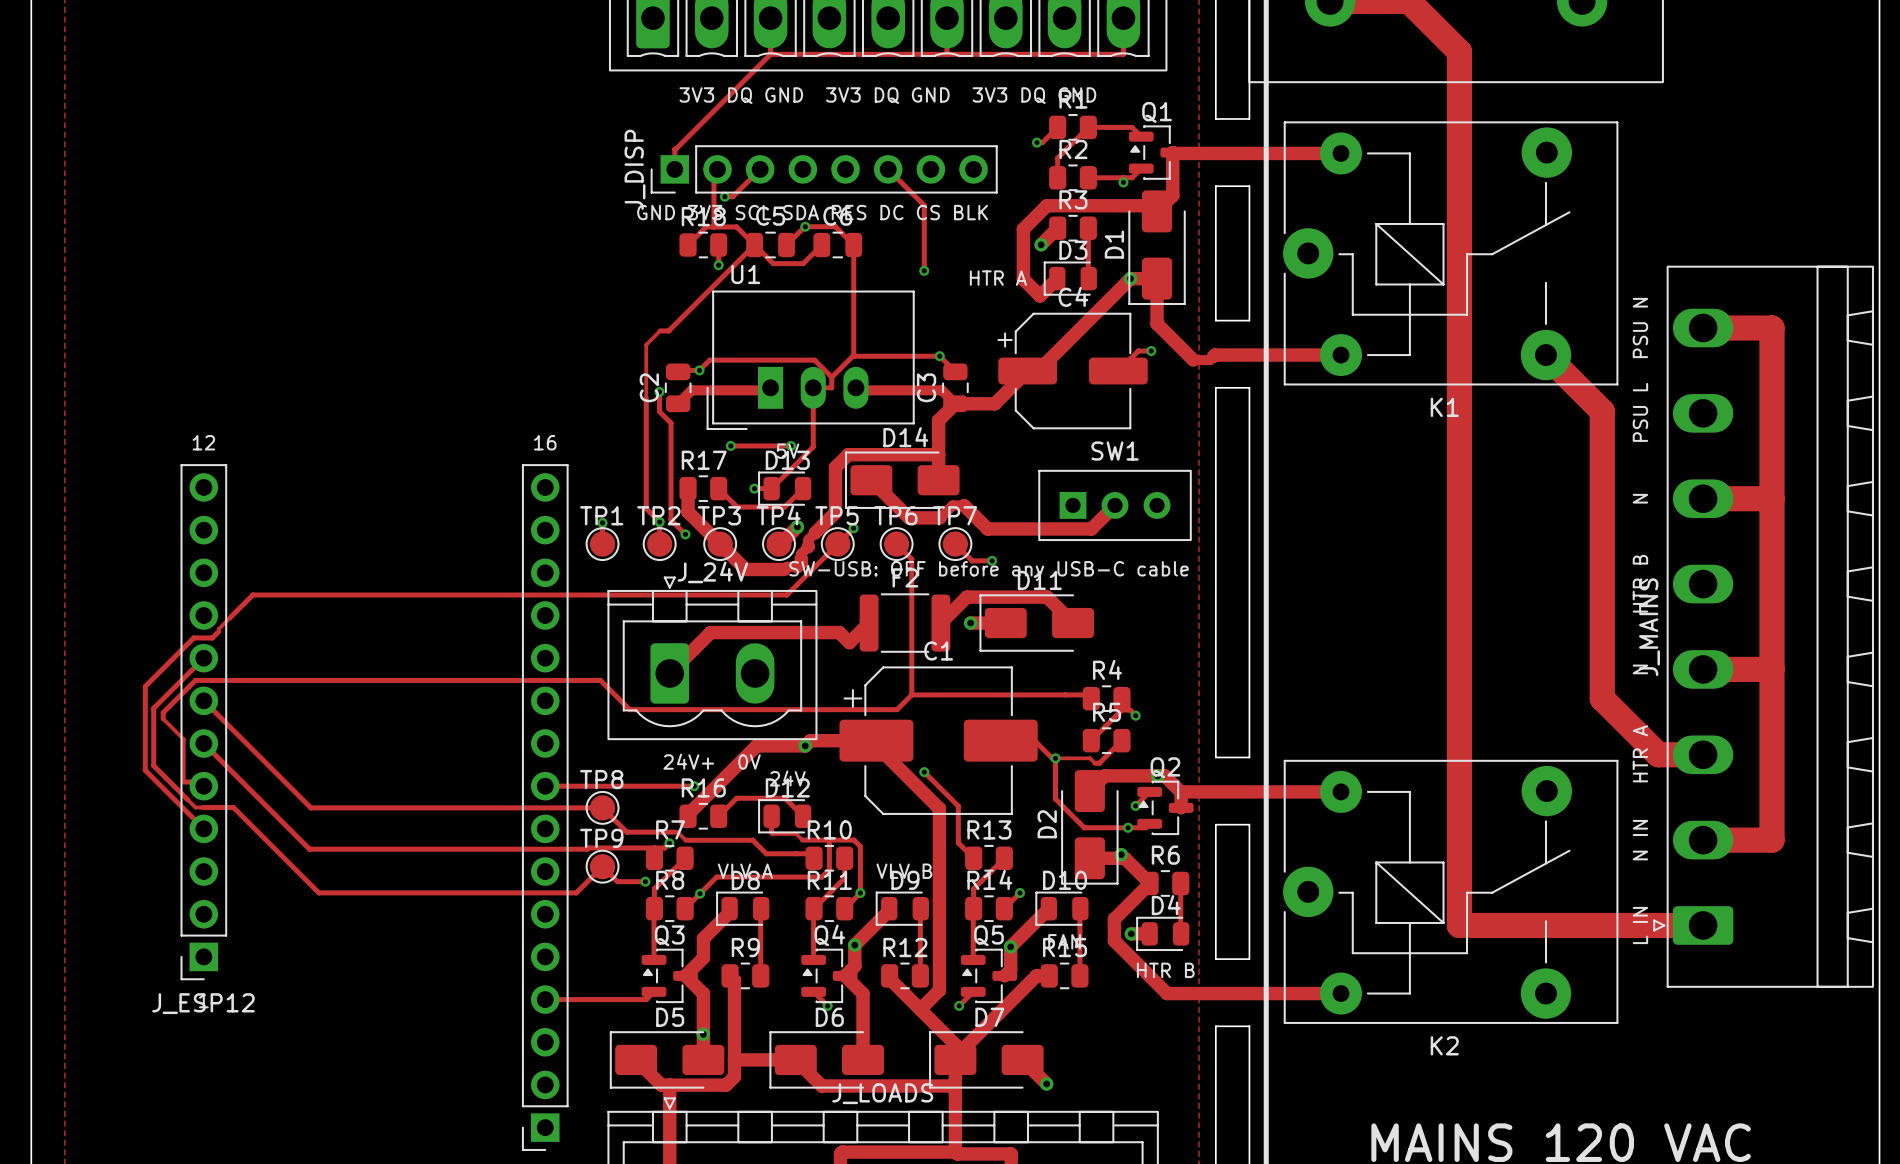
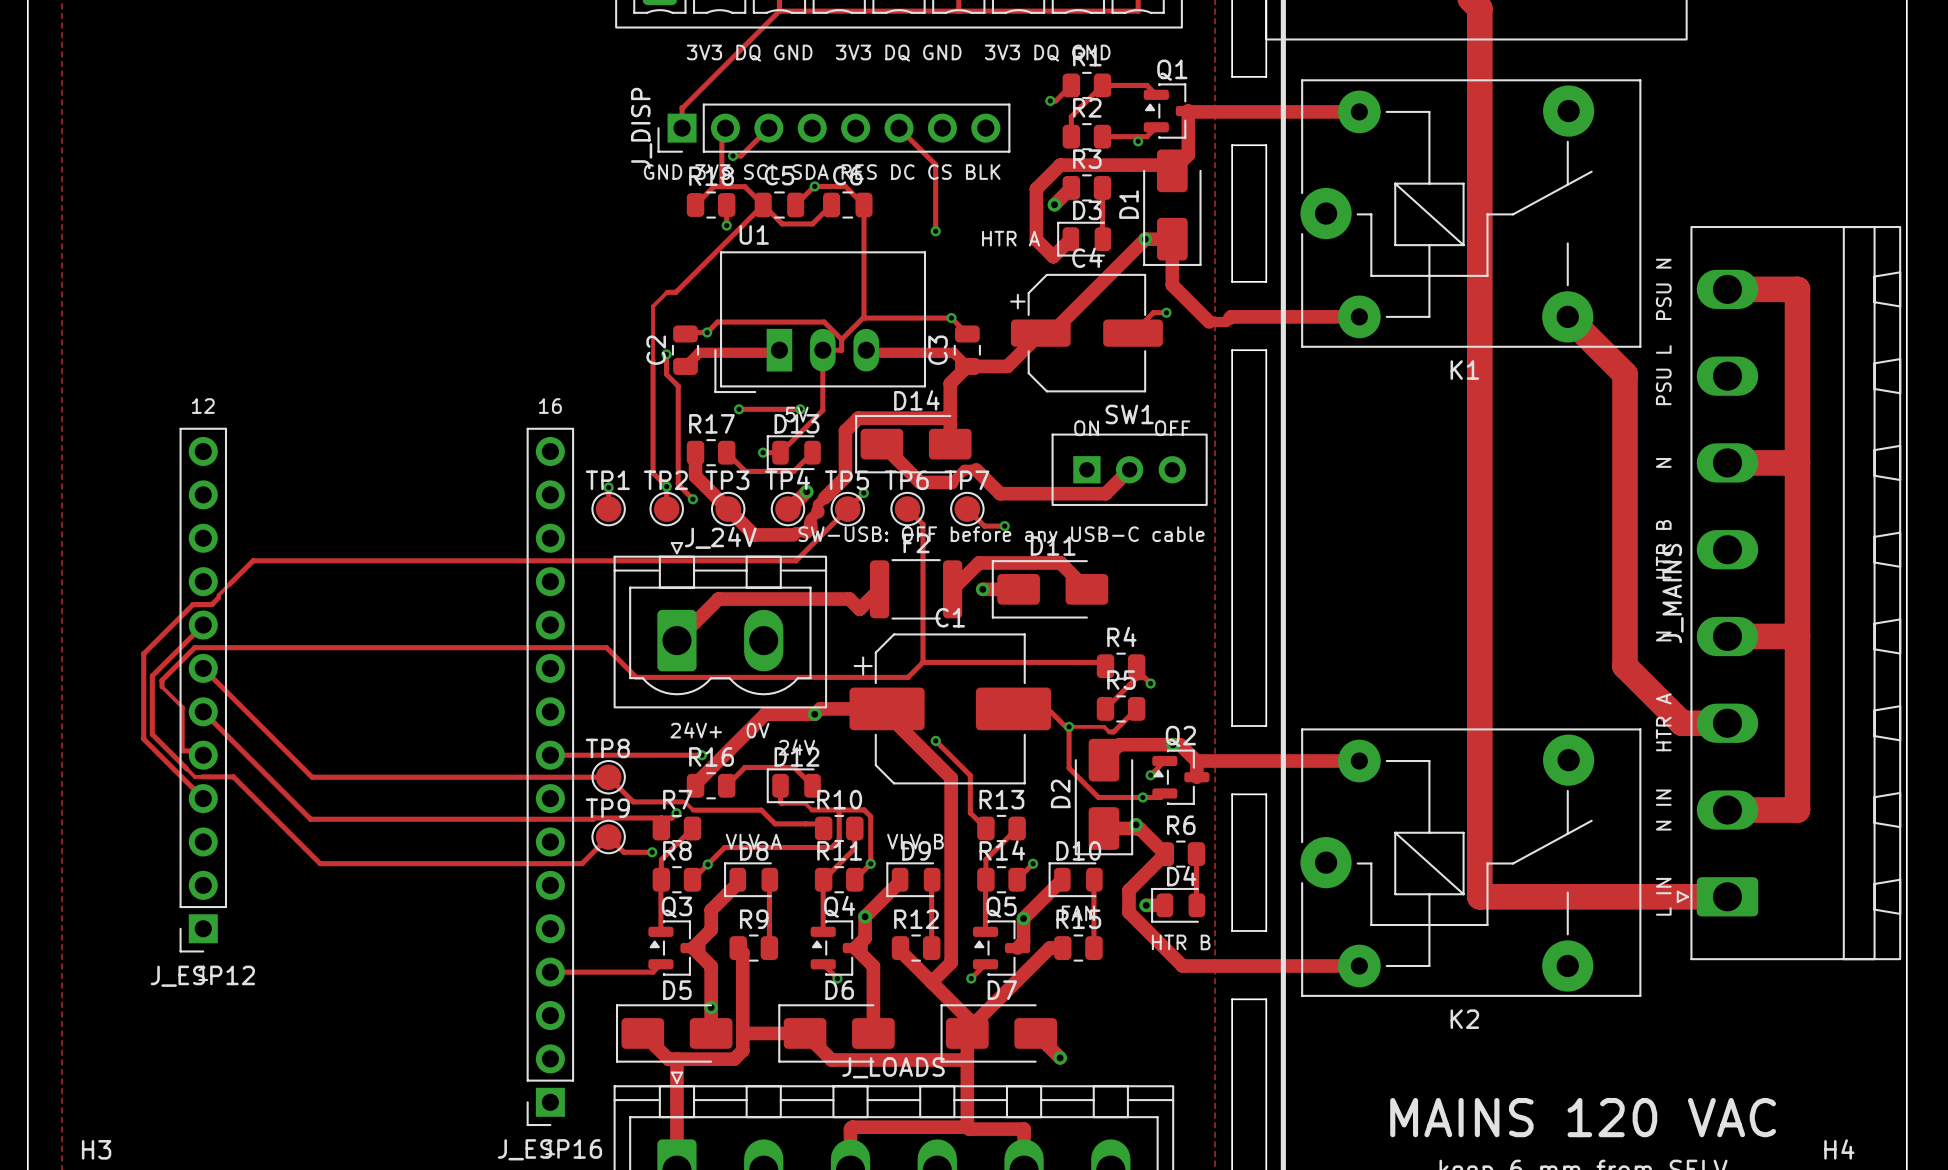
text: none -> ON (1086, 428)
text: none -> OFF (1172, 428)

